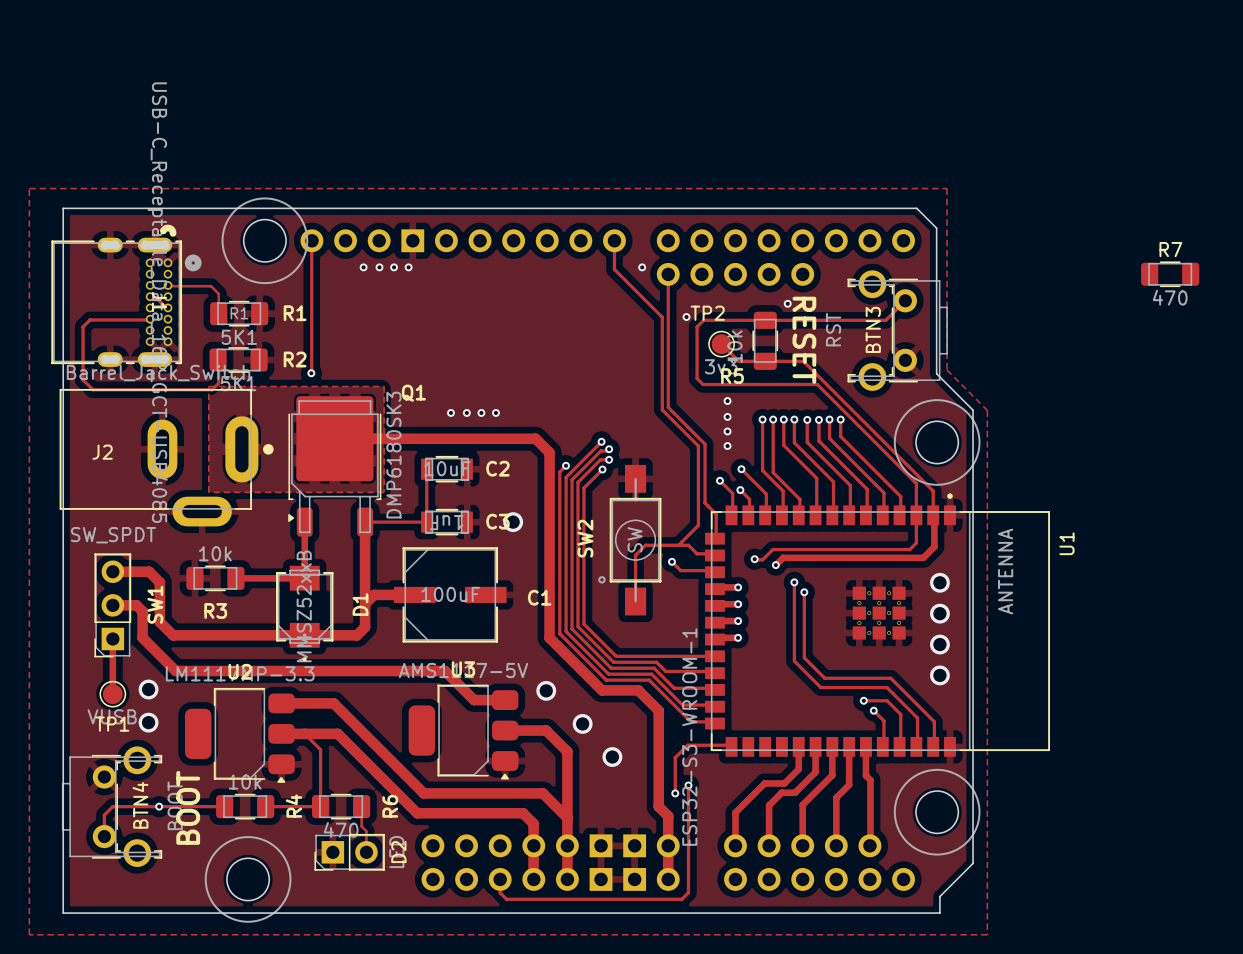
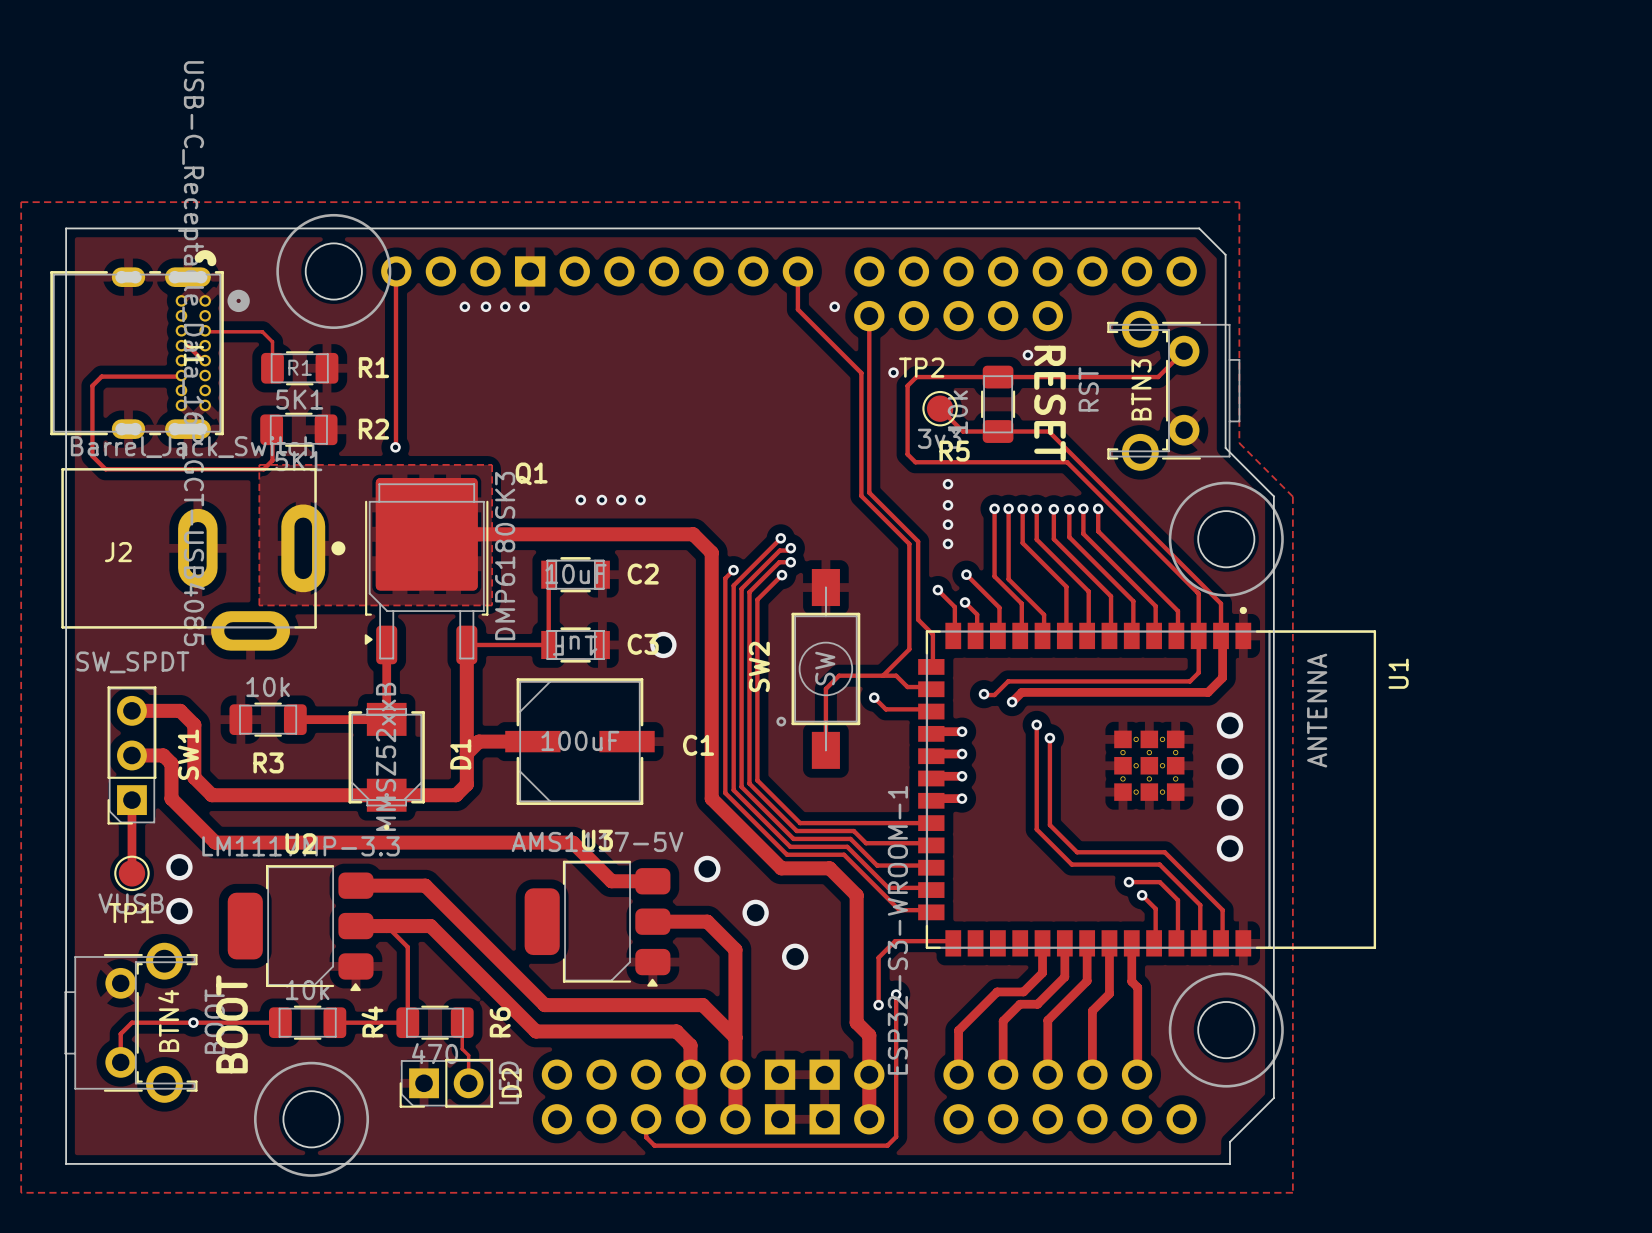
R7: 470 (1170, 274) -> none

